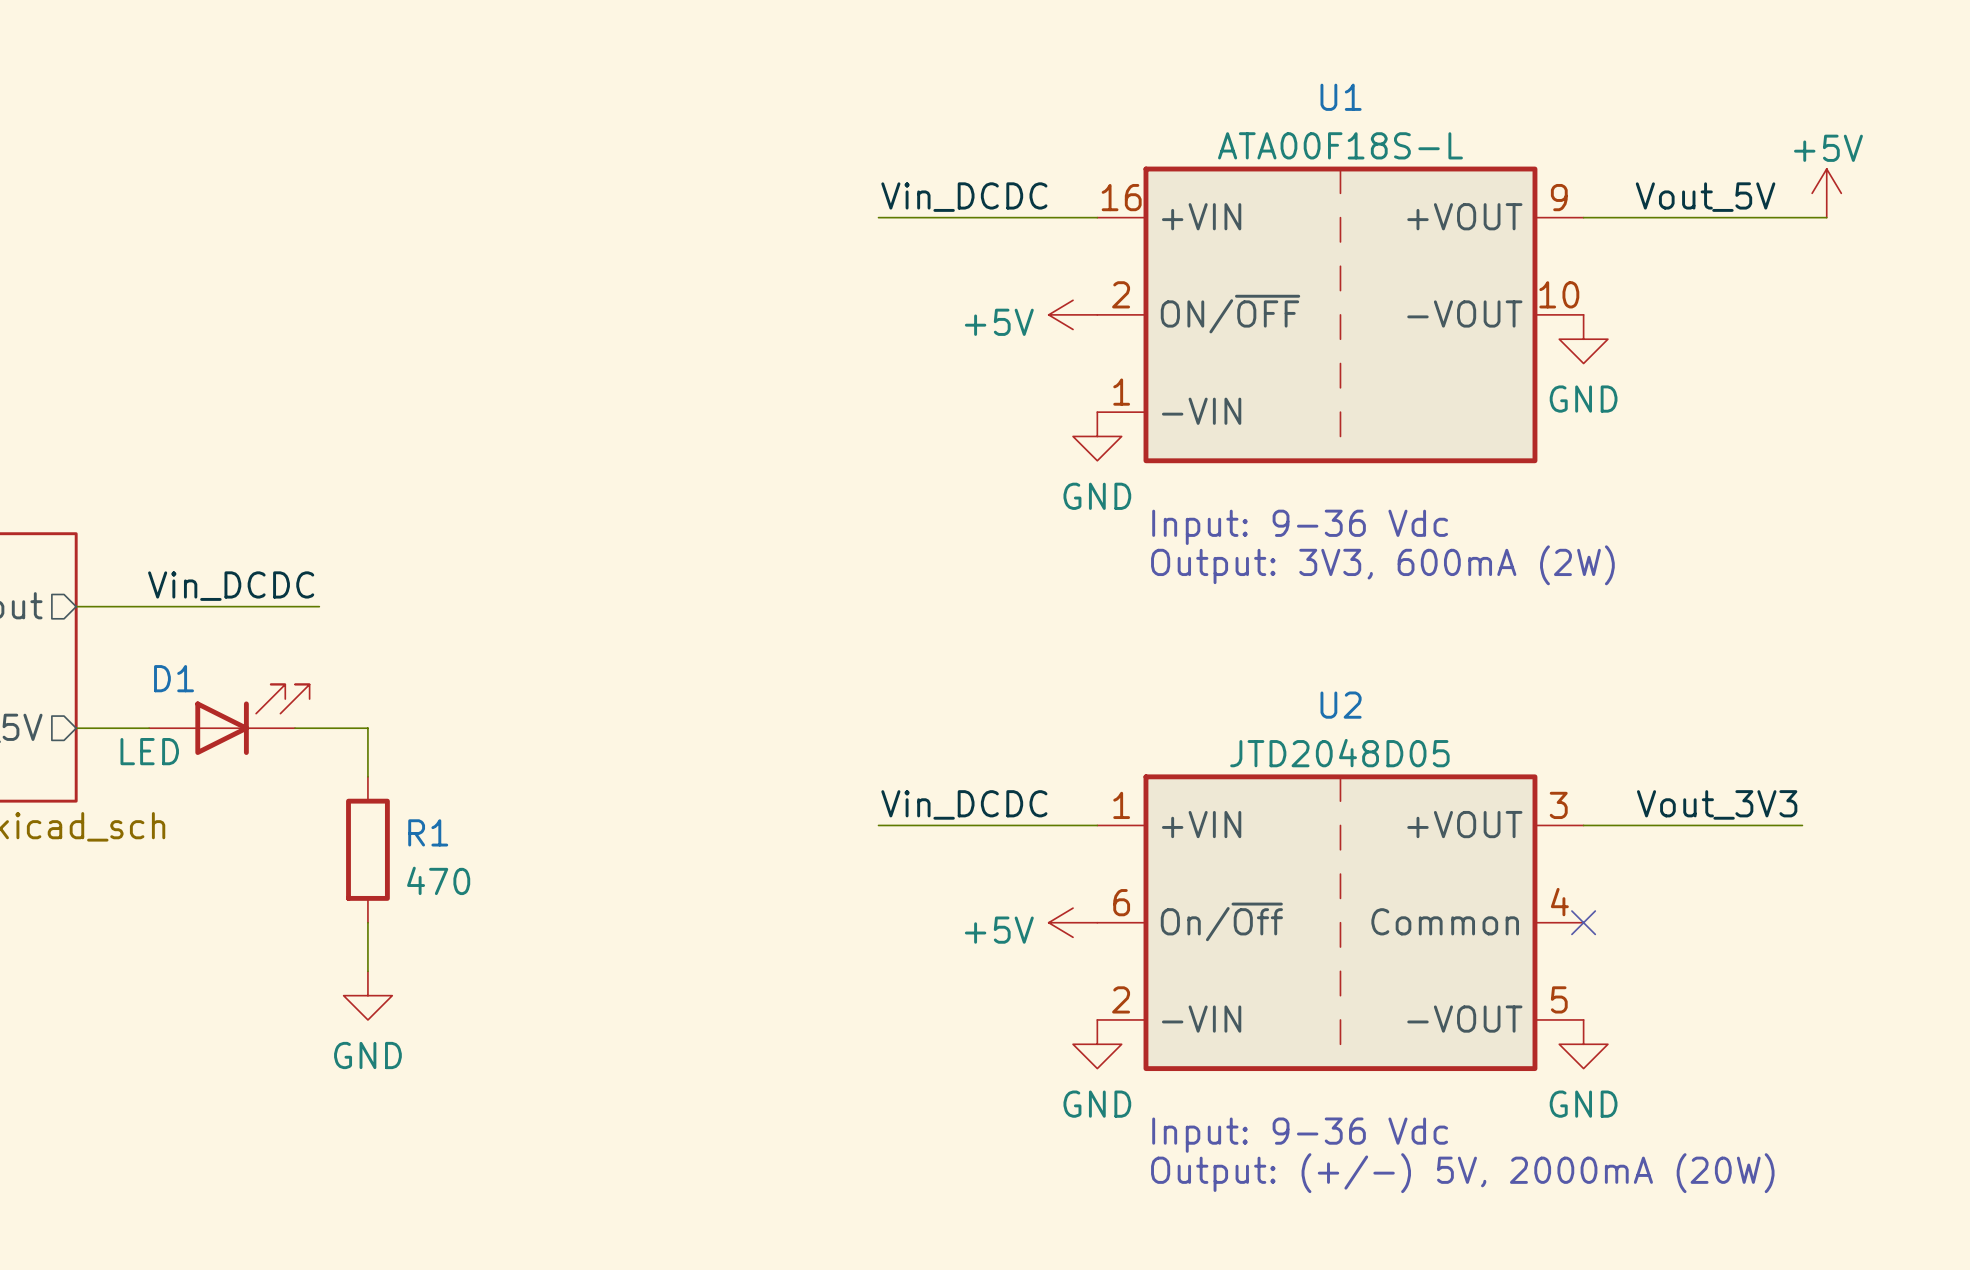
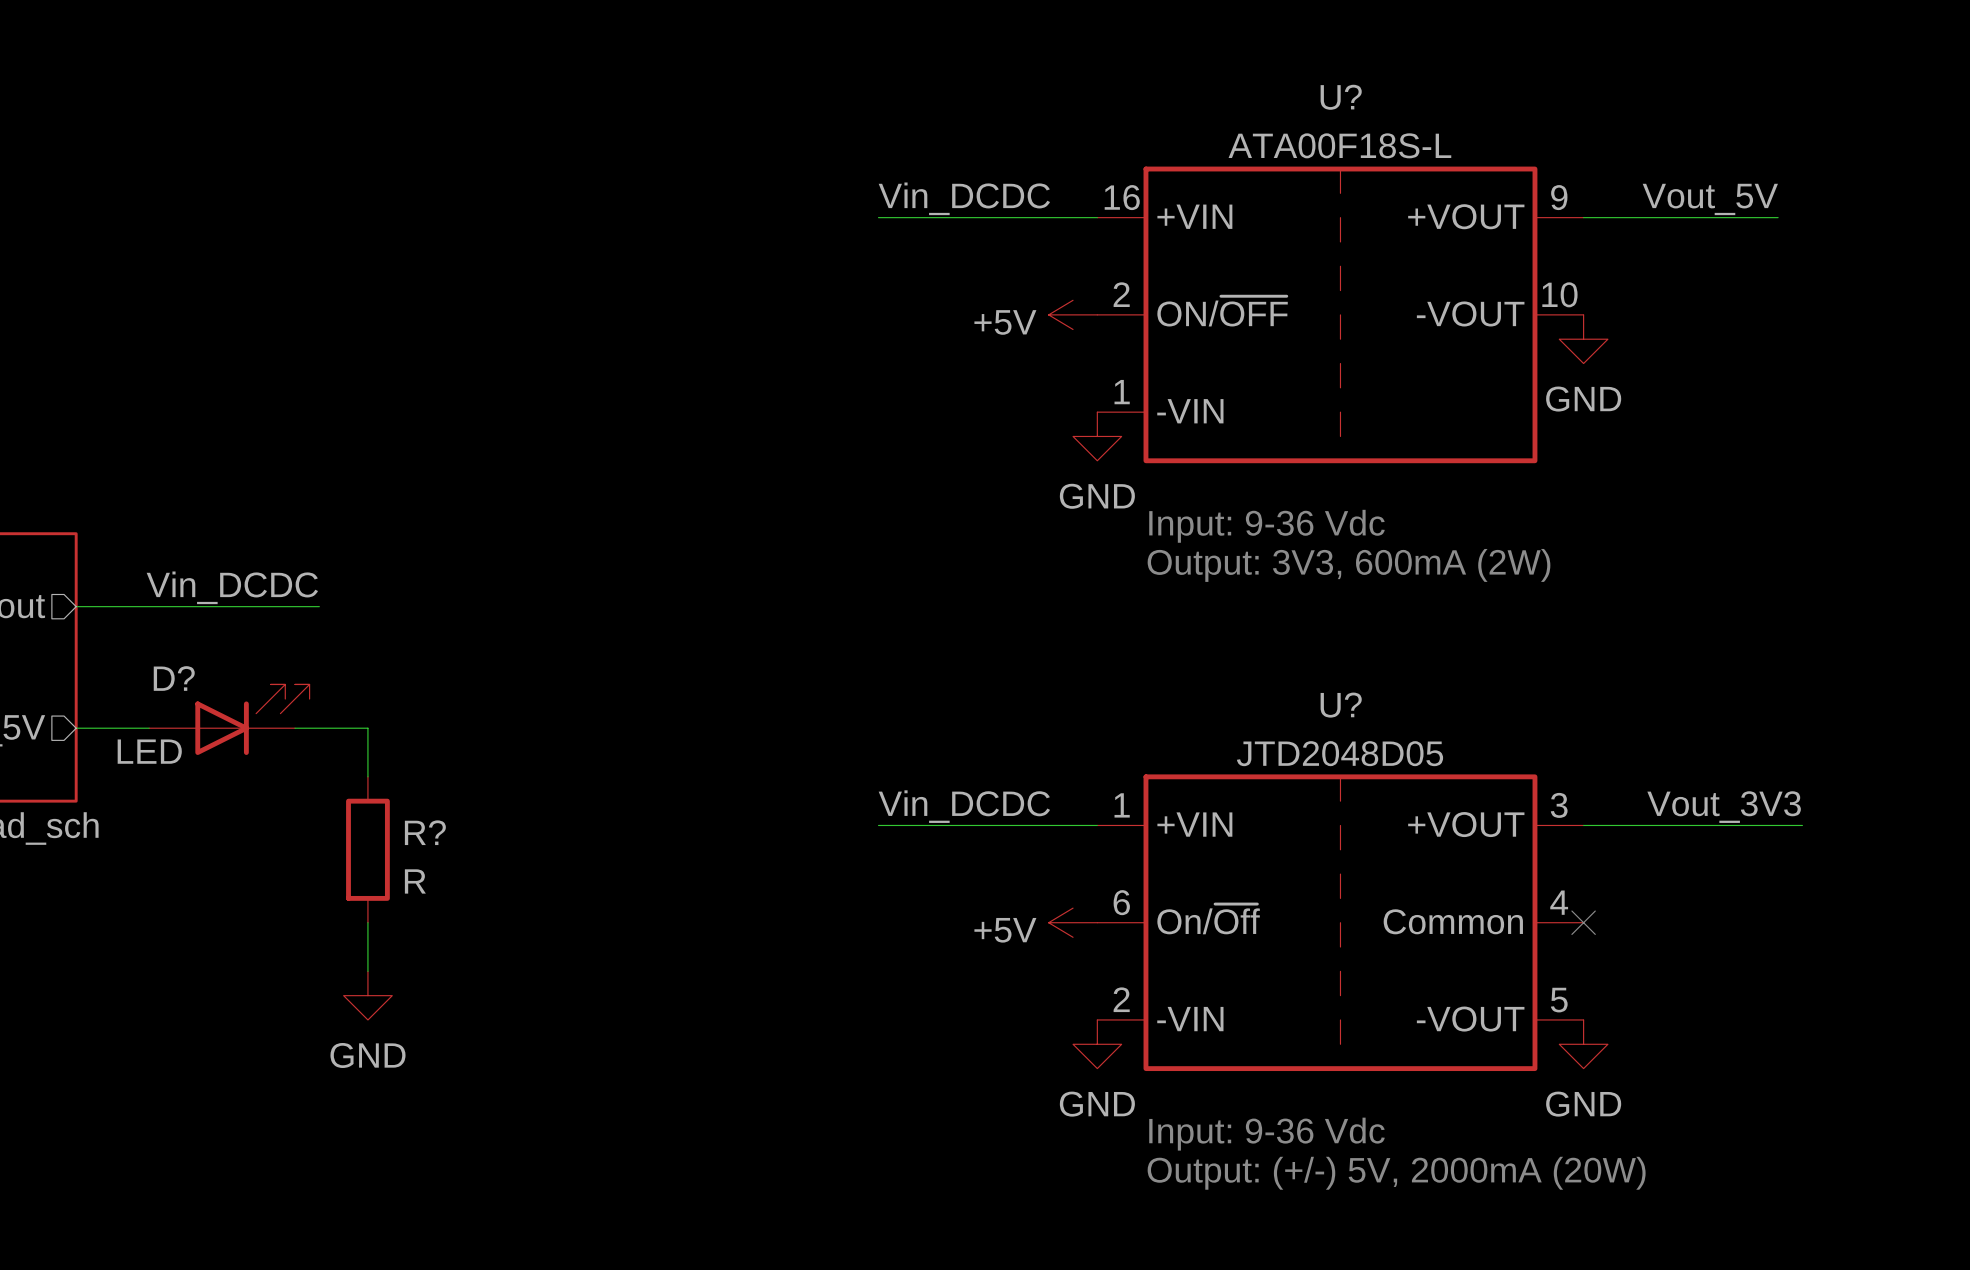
U1 name: U1 (1341, 97) -> U? (1341, 97)
power symbol: +5V (1826, 193) -> none
wire: (1778, 217) (1826, 217) -> none
D1 name: D1 (174, 678) -> D? (174, 678)
U2 name: U2 (1341, 705) -> U? (1341, 705)
R1 name: R1 (428, 832) -> R? (425, 832)
R1 value: 470 (438, 880) -> R (415, 881)

